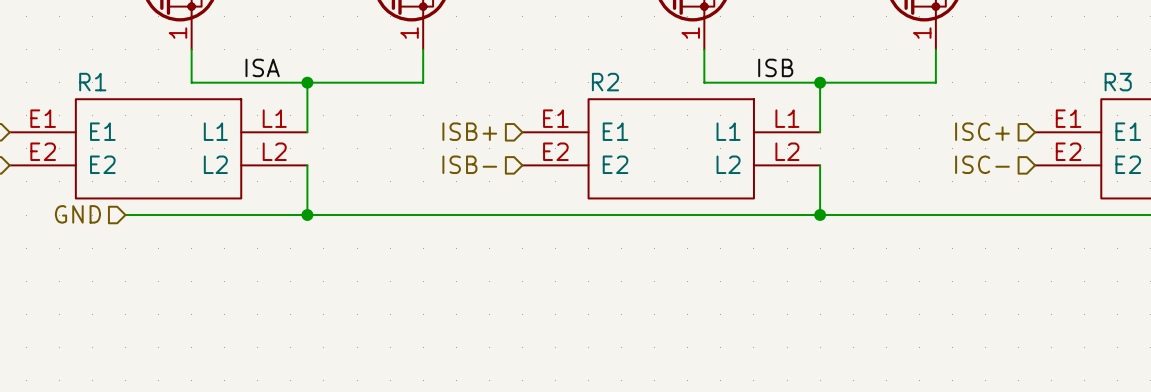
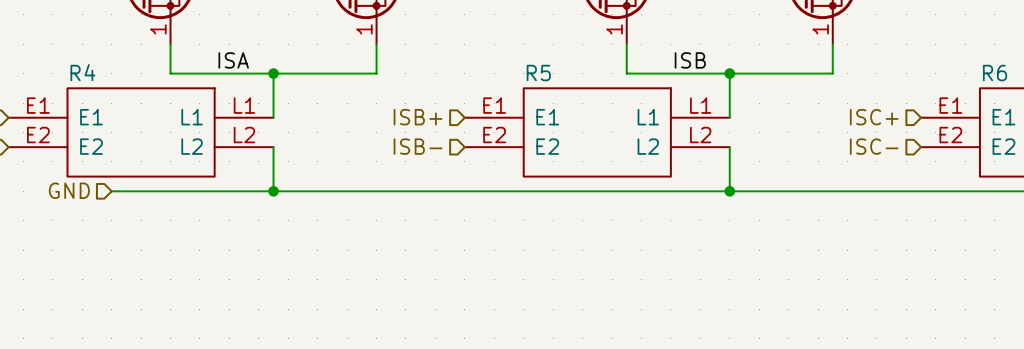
R1 name: R1 (92, 82) -> R4 (82, 72)
R2 name: R2 (605, 82) -> R5 (538, 73)
R3 name: R3 (1118, 82) -> R6 (995, 73)

